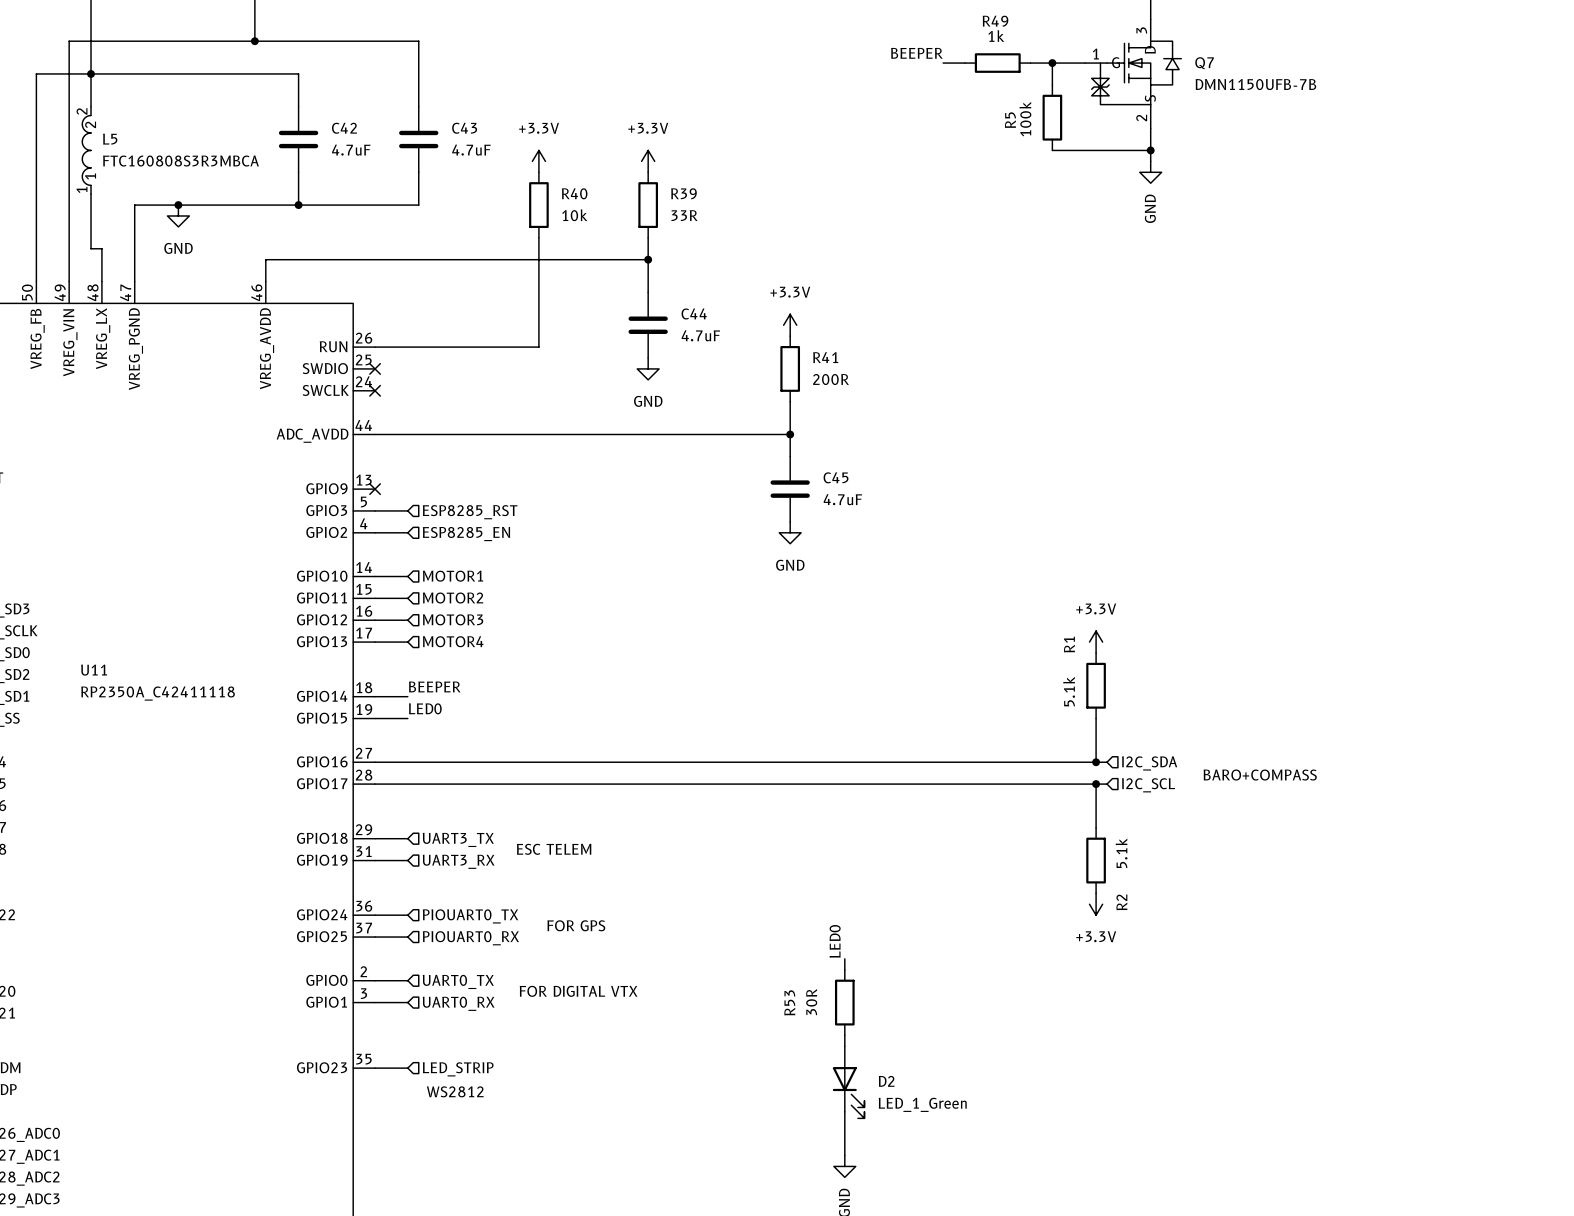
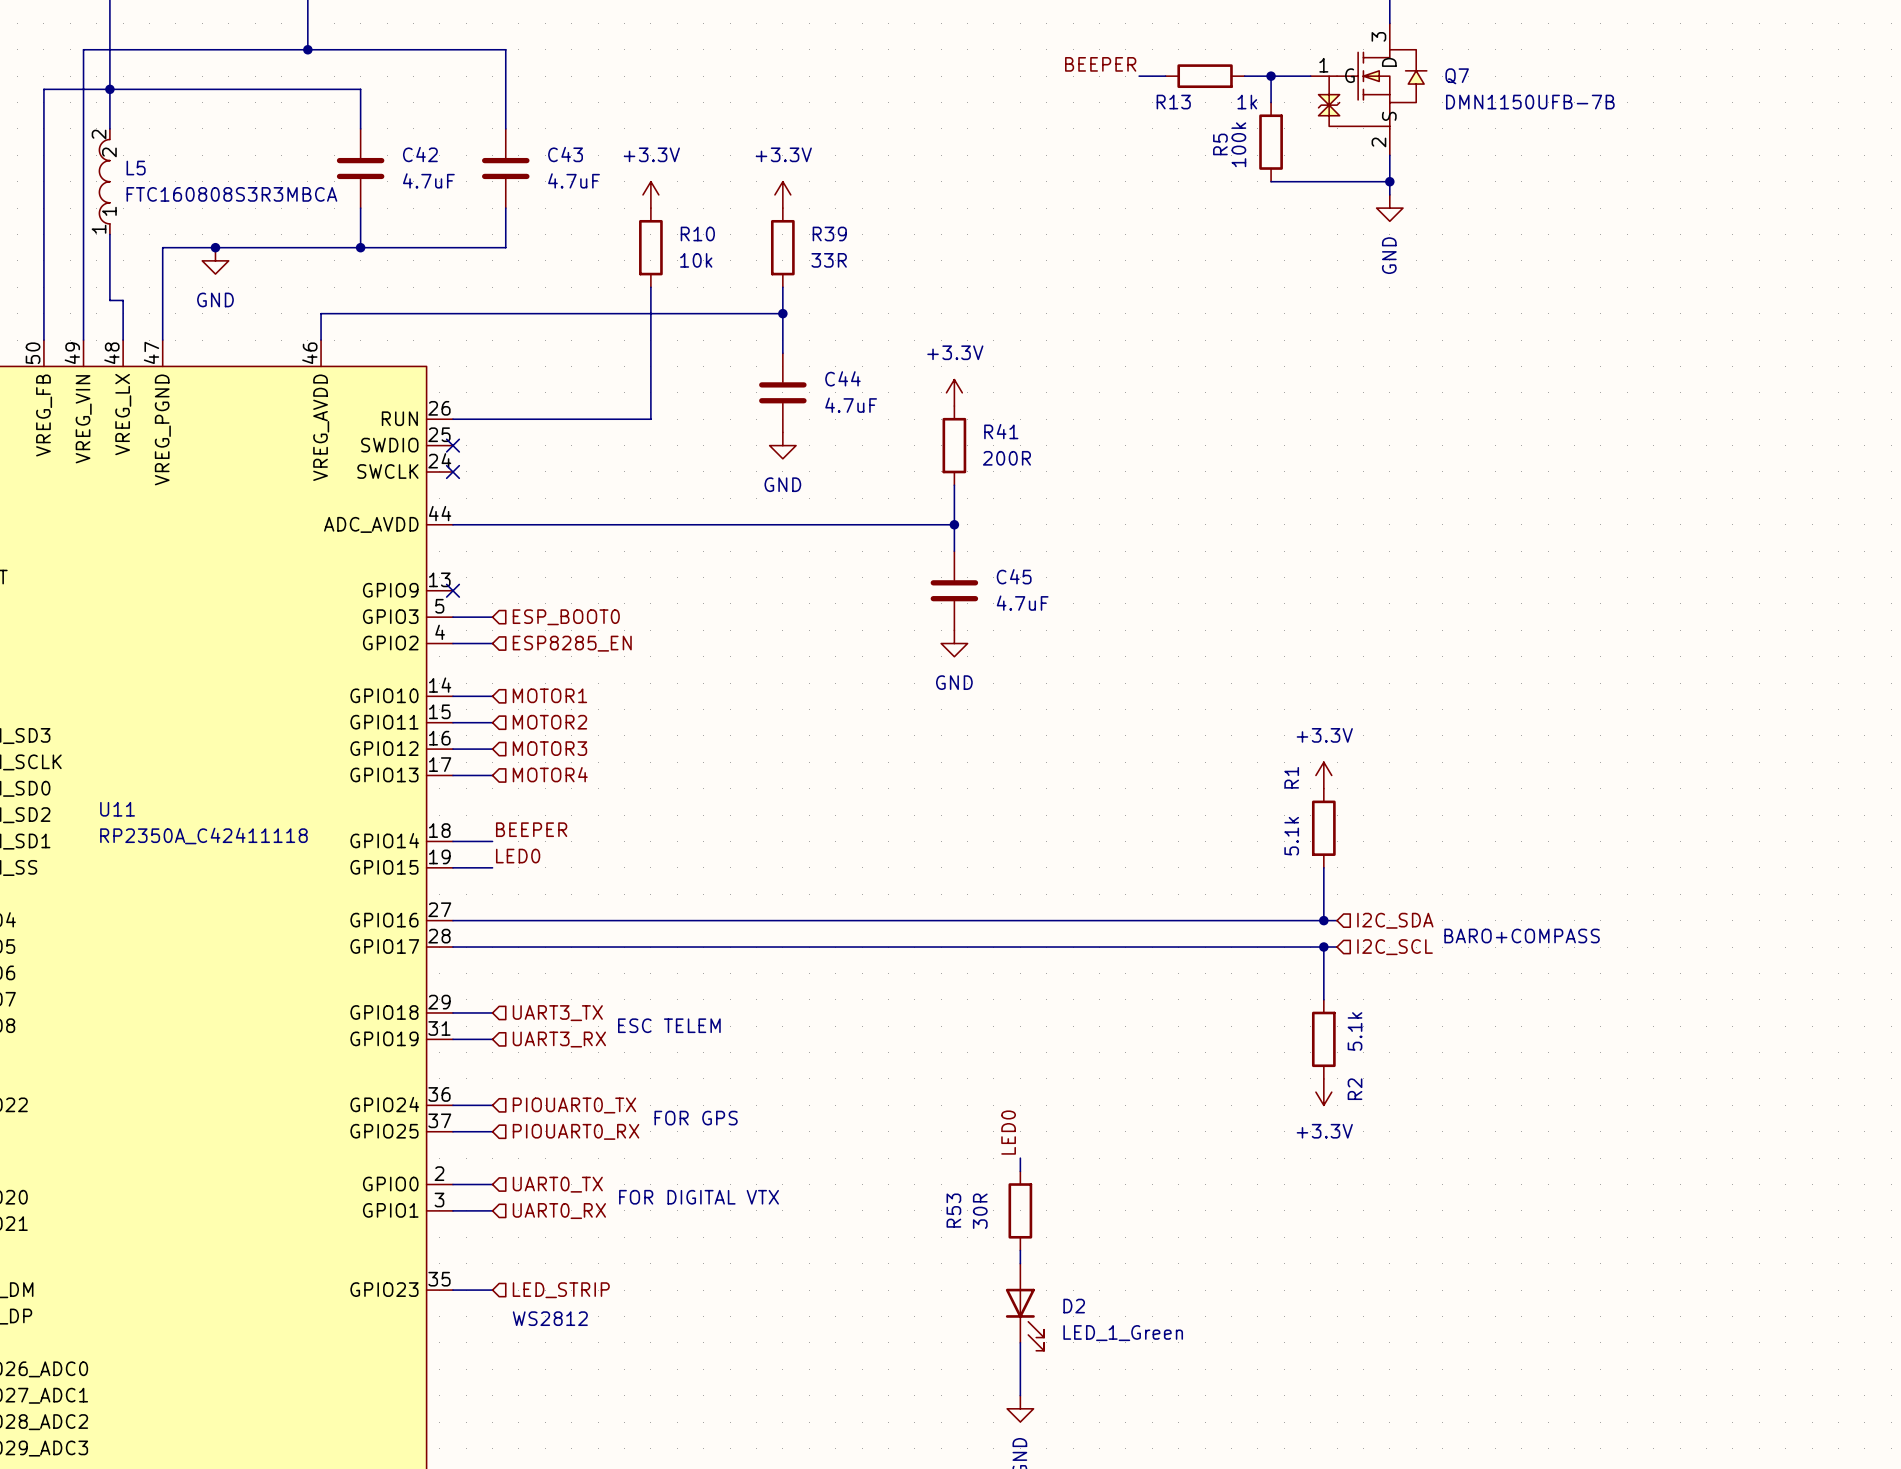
R49 name: R49 (995, 21) -> R13 (1173, 102)
R49 value position: 1k (996, 36) -> 1k (1247, 102)
R40 name: R40 (574, 193) -> R10 (697, 233)
hierarchical label: ESP8285_RST (470, 512) -> ESP_BOOT0 (566, 617)

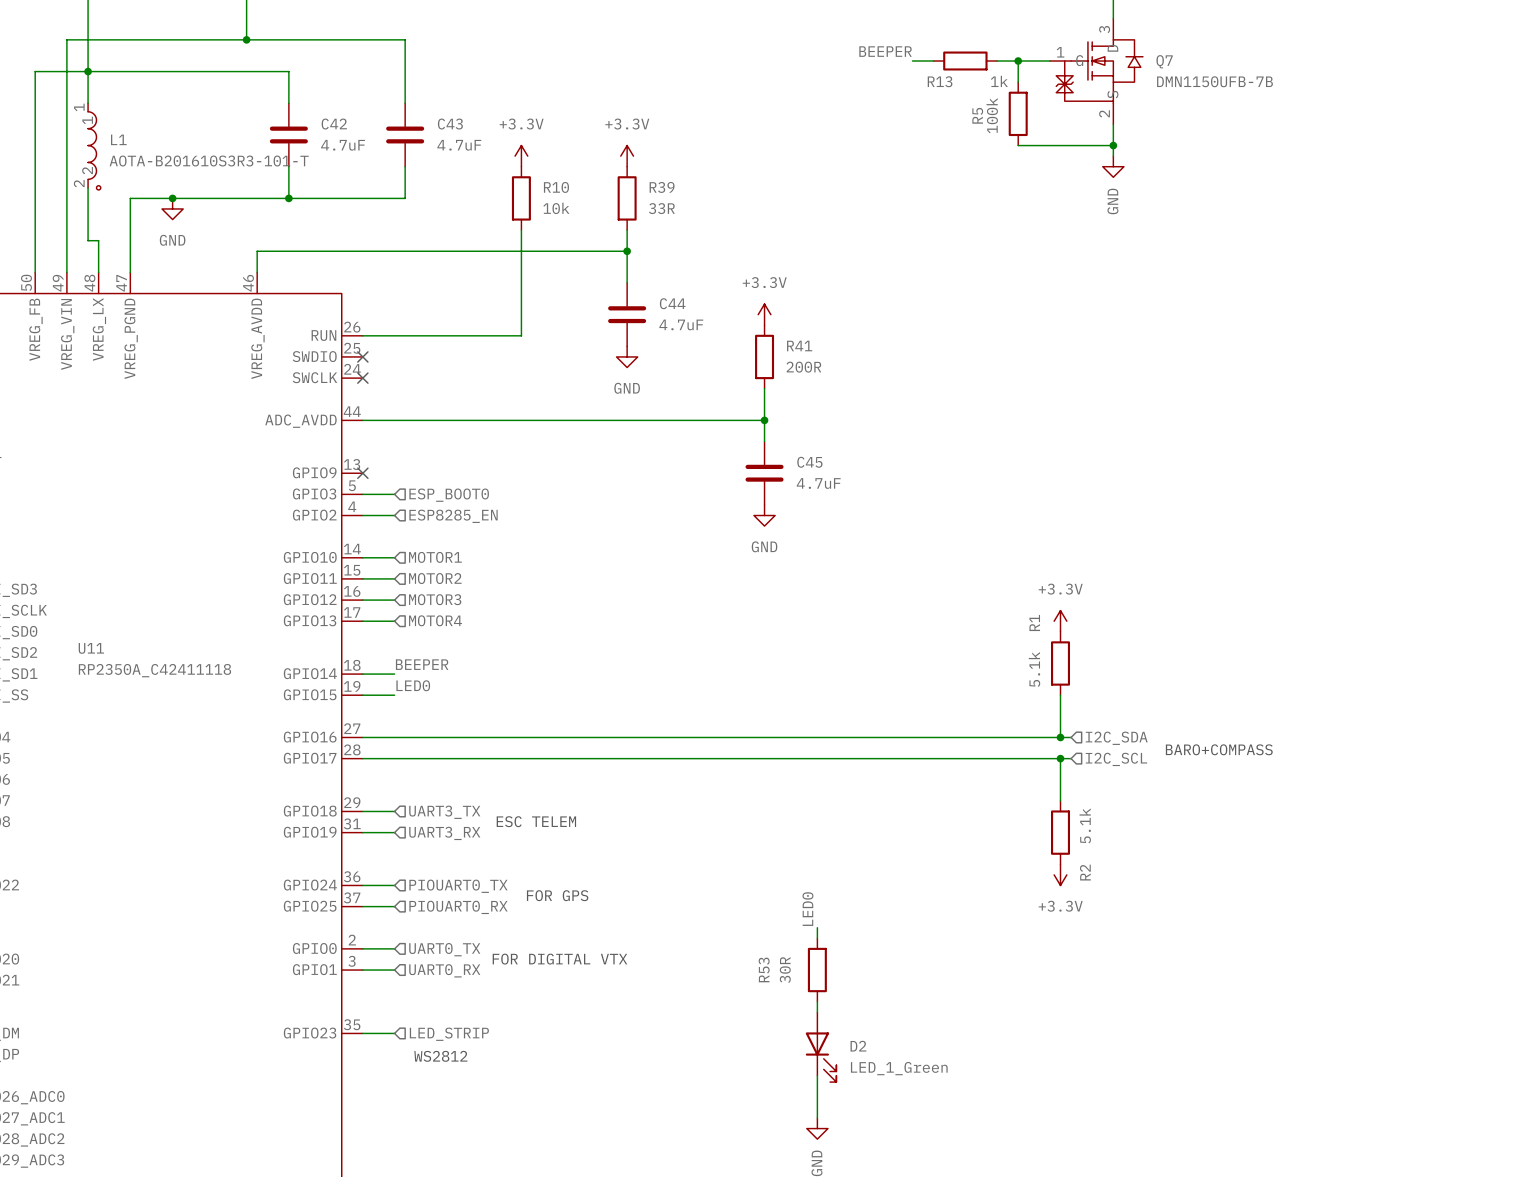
L5: FTC160808S3R3MBCA (104, 181) -> none
L1: none -> AOTA-B201610S3R3-101-T (94, 146)

